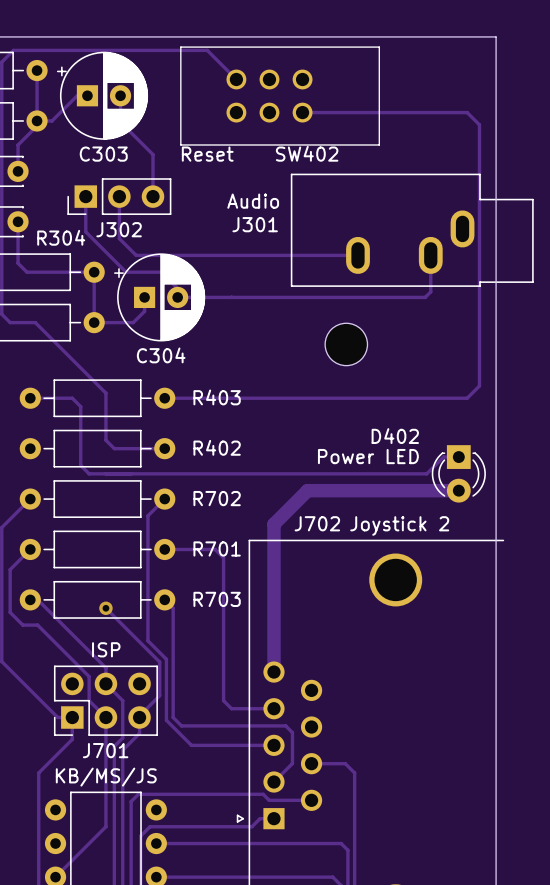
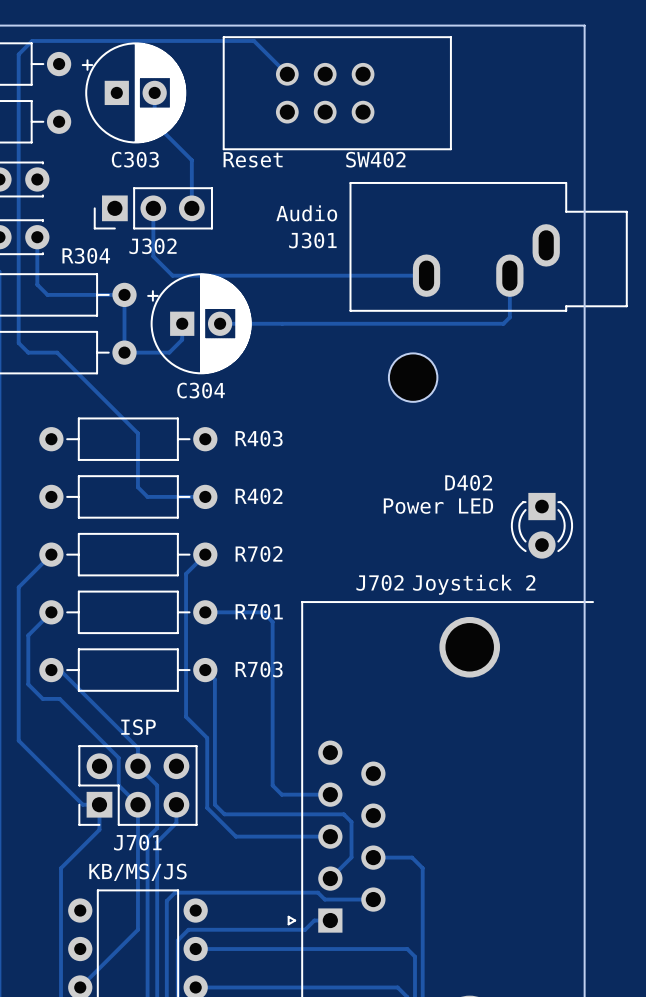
track: (35, 70) (37, 72) (37, 120) (52, 120) (78, 94) (87, 95) -> none
track: (302, 112) (467, 112) (479, 124) (479, 385) (467, 398) (164, 398) -> none
track: (38, 120) (38, 124) (18, 145) (18, 171) -> none
track: (85, 196) (85, 231) (126, 272) (161, 272) (178, 289) (177, 295) -> none
track: (30, 398) (72, 398) (80, 406) (80, 465) (89, 473) (426, 473) (443, 457) (458, 457) -> none
track: (458, 490) (307, 490) (273, 524) (273, 672) -> none
track: (105, 608) (159, 662) (159, 695) (146, 708) (146, 718) (139, 725) -> none
via: (105, 608) -> none

